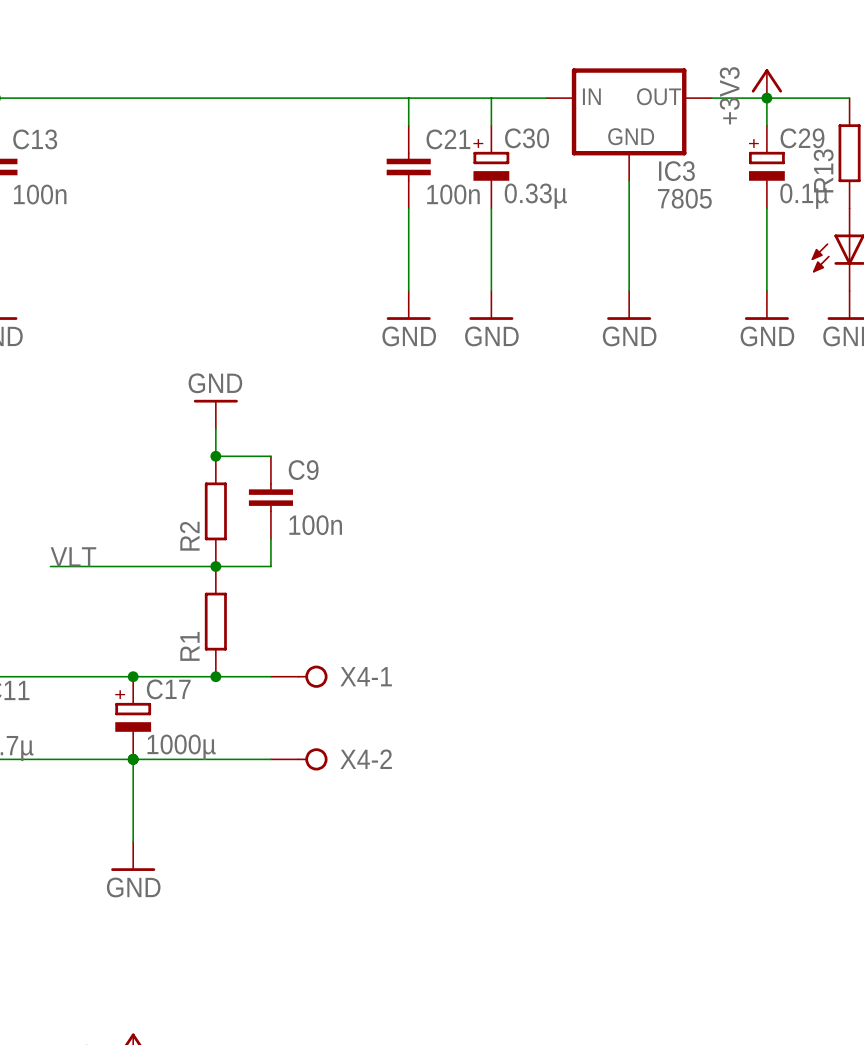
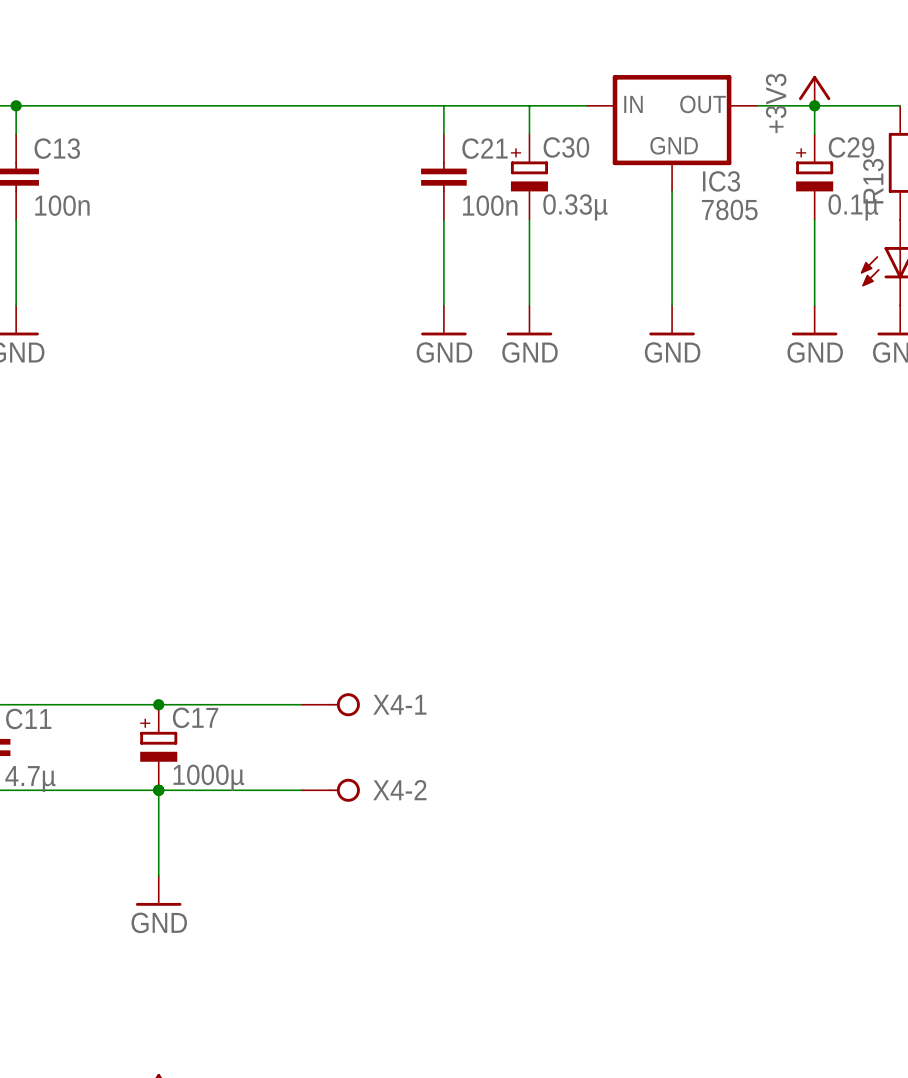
power symbol: GND (215, 414) -> none
wire: (215, 428) (215, 456) (270, 456) -> none
junction: (215, 456) -> none
C9: 100n (270, 497) -> none
R2: (215, 511) -> none
wire: (270, 538) (270, 566) (50, 566) -> none
label: VLT (73, 556) -> none
junction: (215, 566) -> none
R1: (215, 621) -> none
junction: (215, 676) -> none

